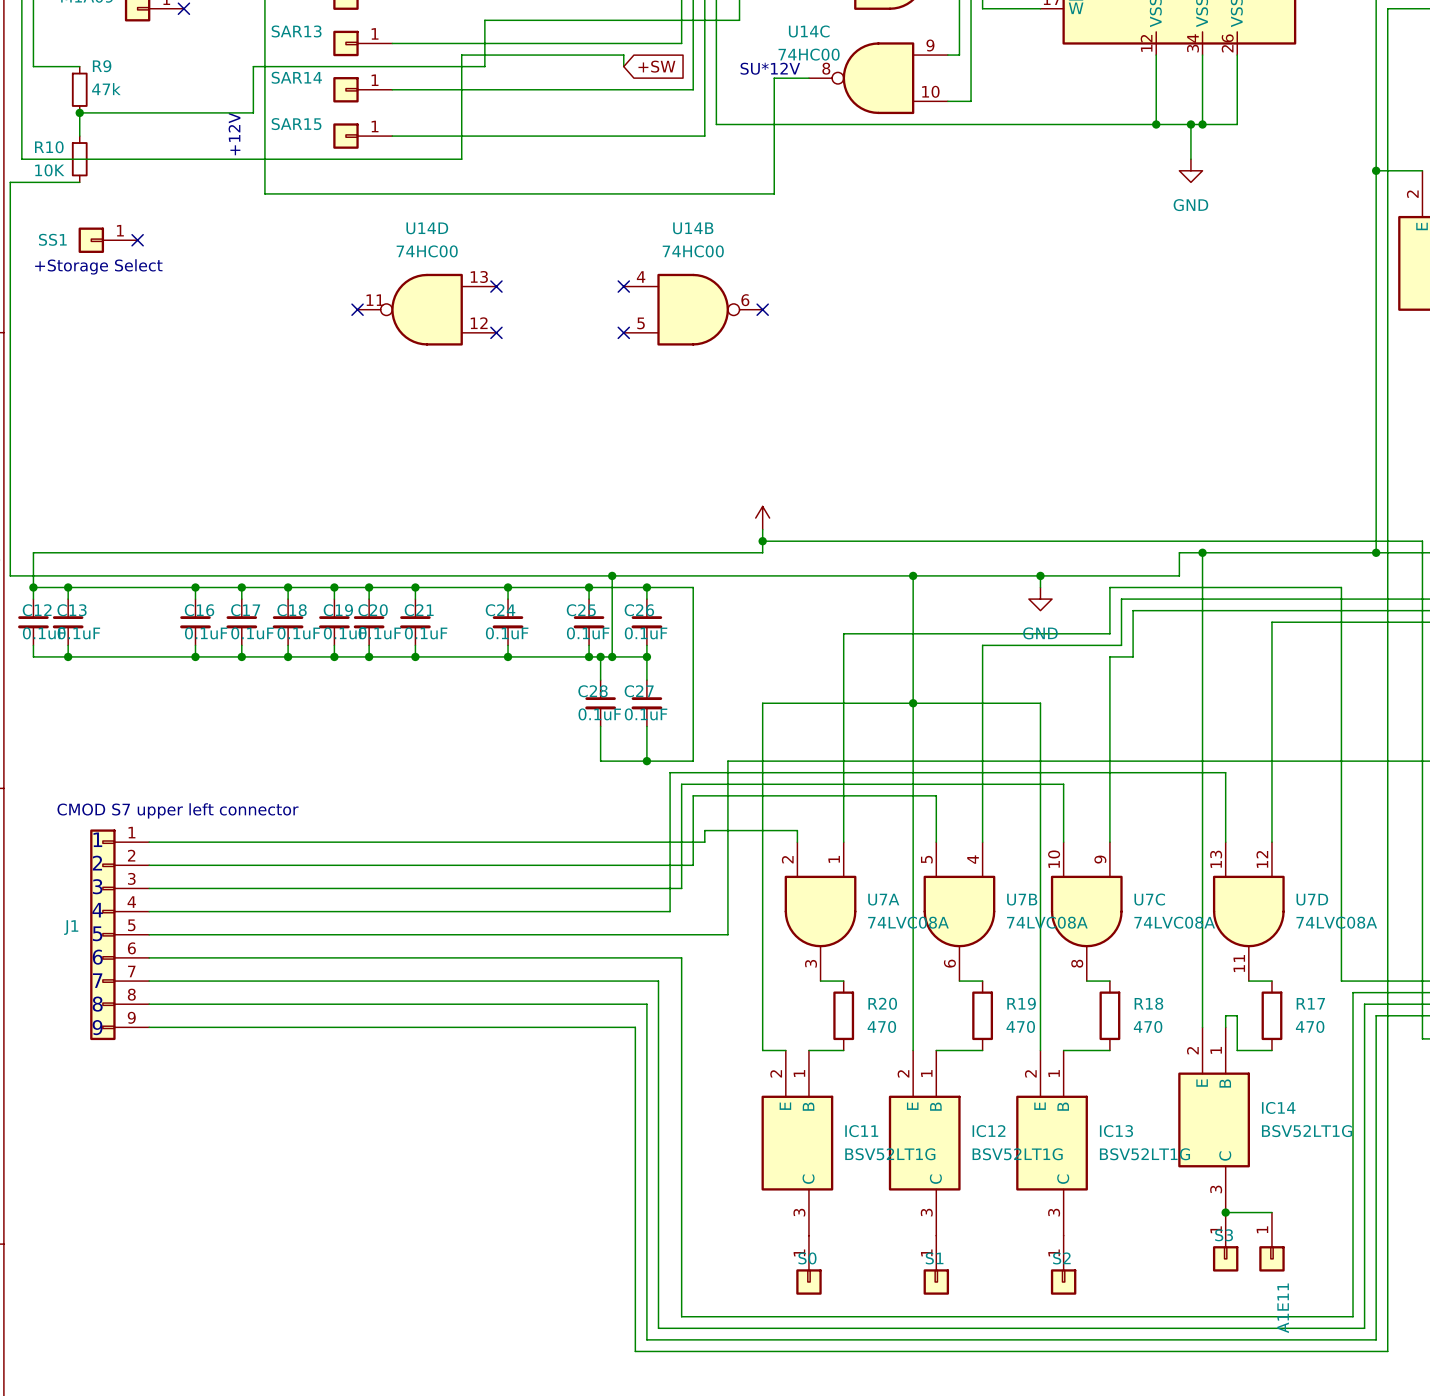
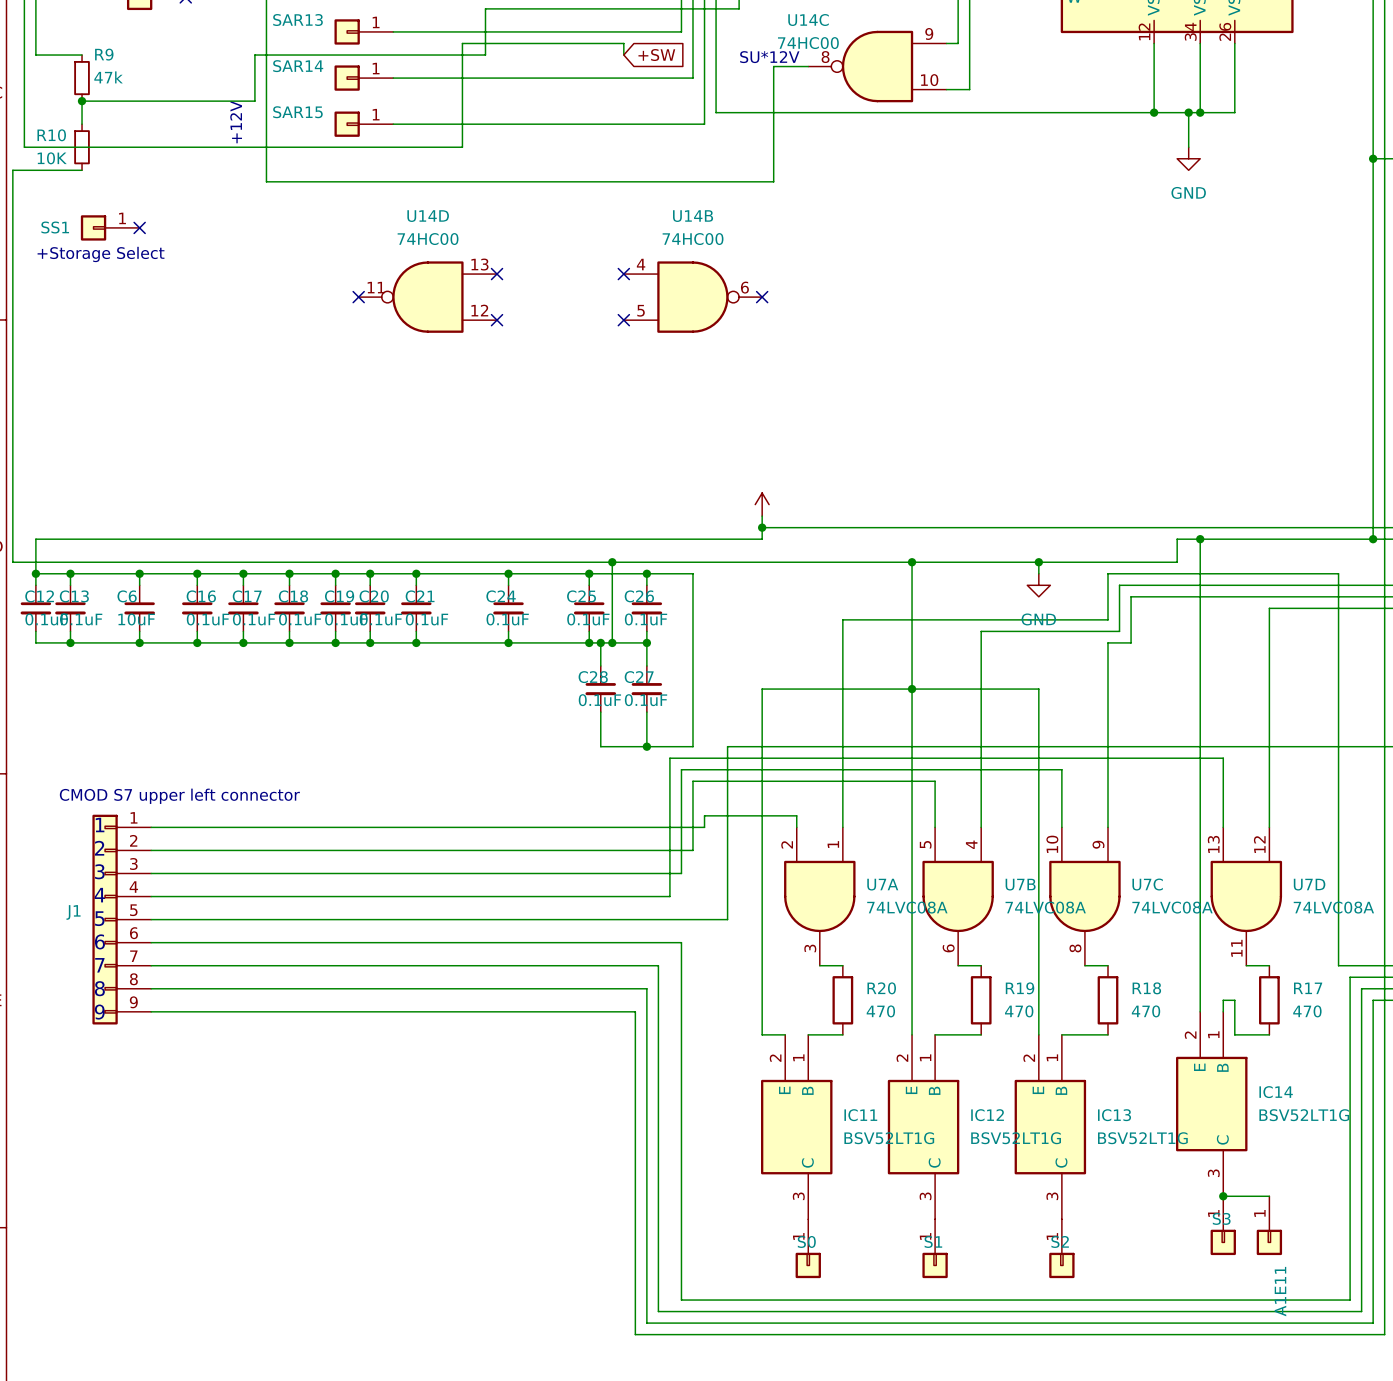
wire: none -> (139, 573) (139, 585)
junction: none -> (139, 573)
C6: none -> 10uF (139, 608)
wire: none -> (139, 631) (139, 642)
junction: none -> (139, 642)

